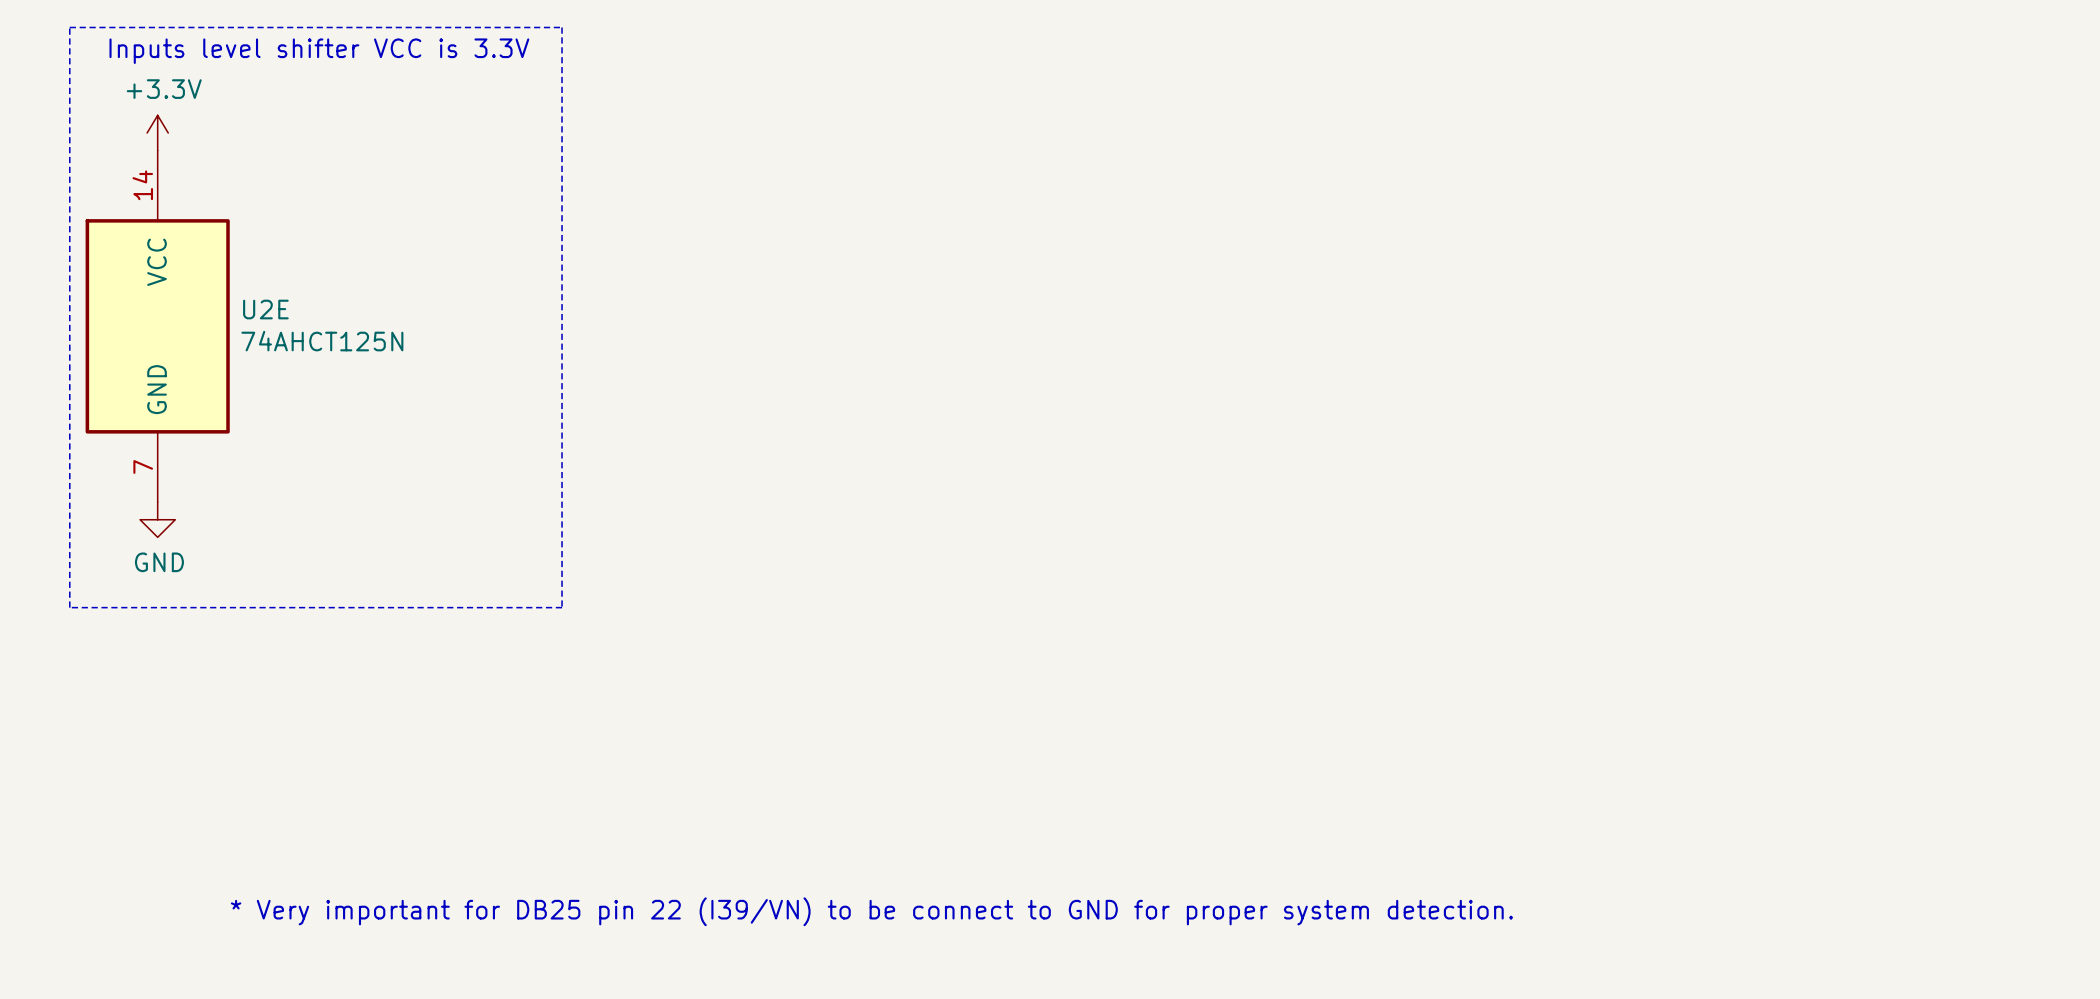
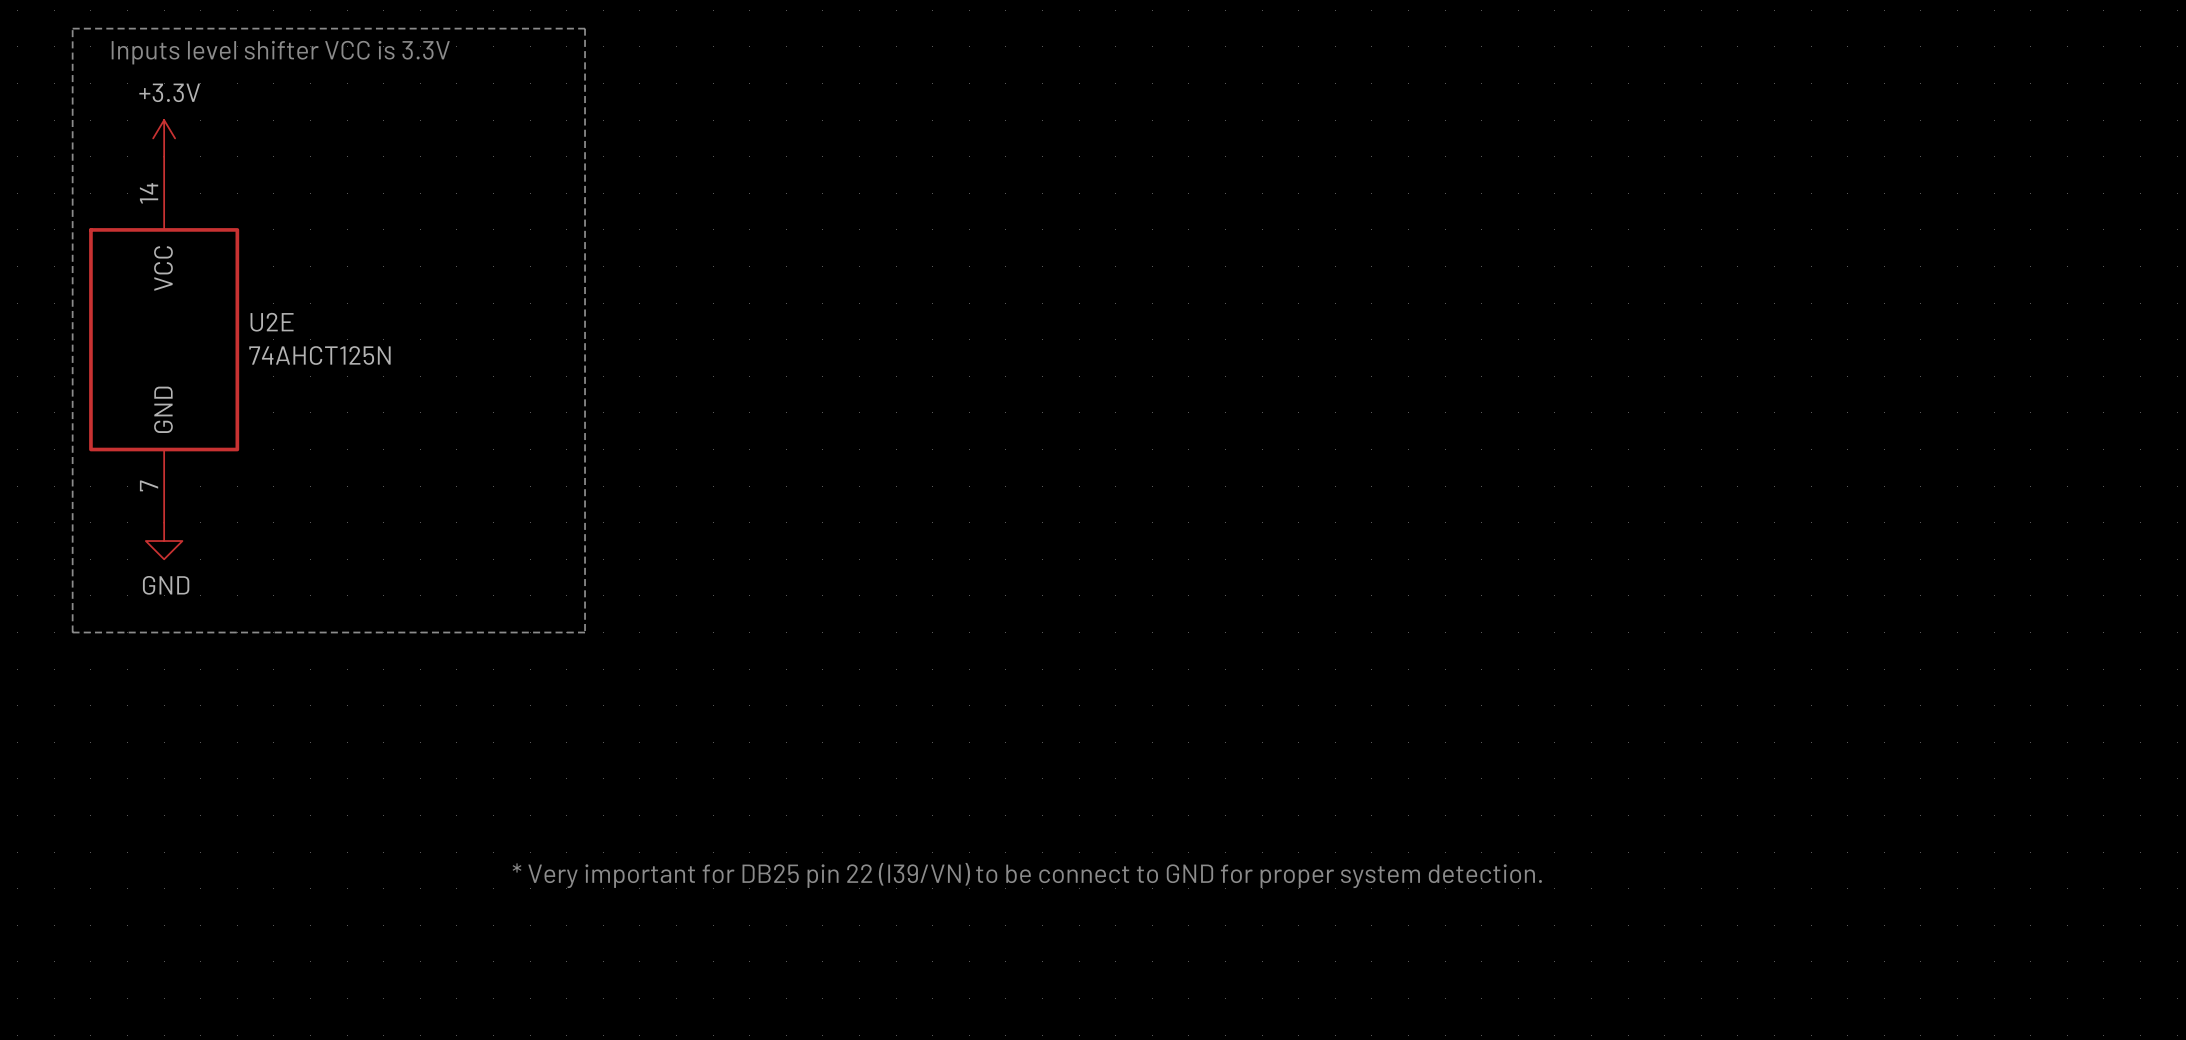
text position: * Very important for DB25 pin 22 (I39/VN) to be connect to GND for proper system detection. (871, 911) -> * Very important for DB25 pin 22 (I39/VN) to be connect to GND for proper system detection. (1027, 875)

